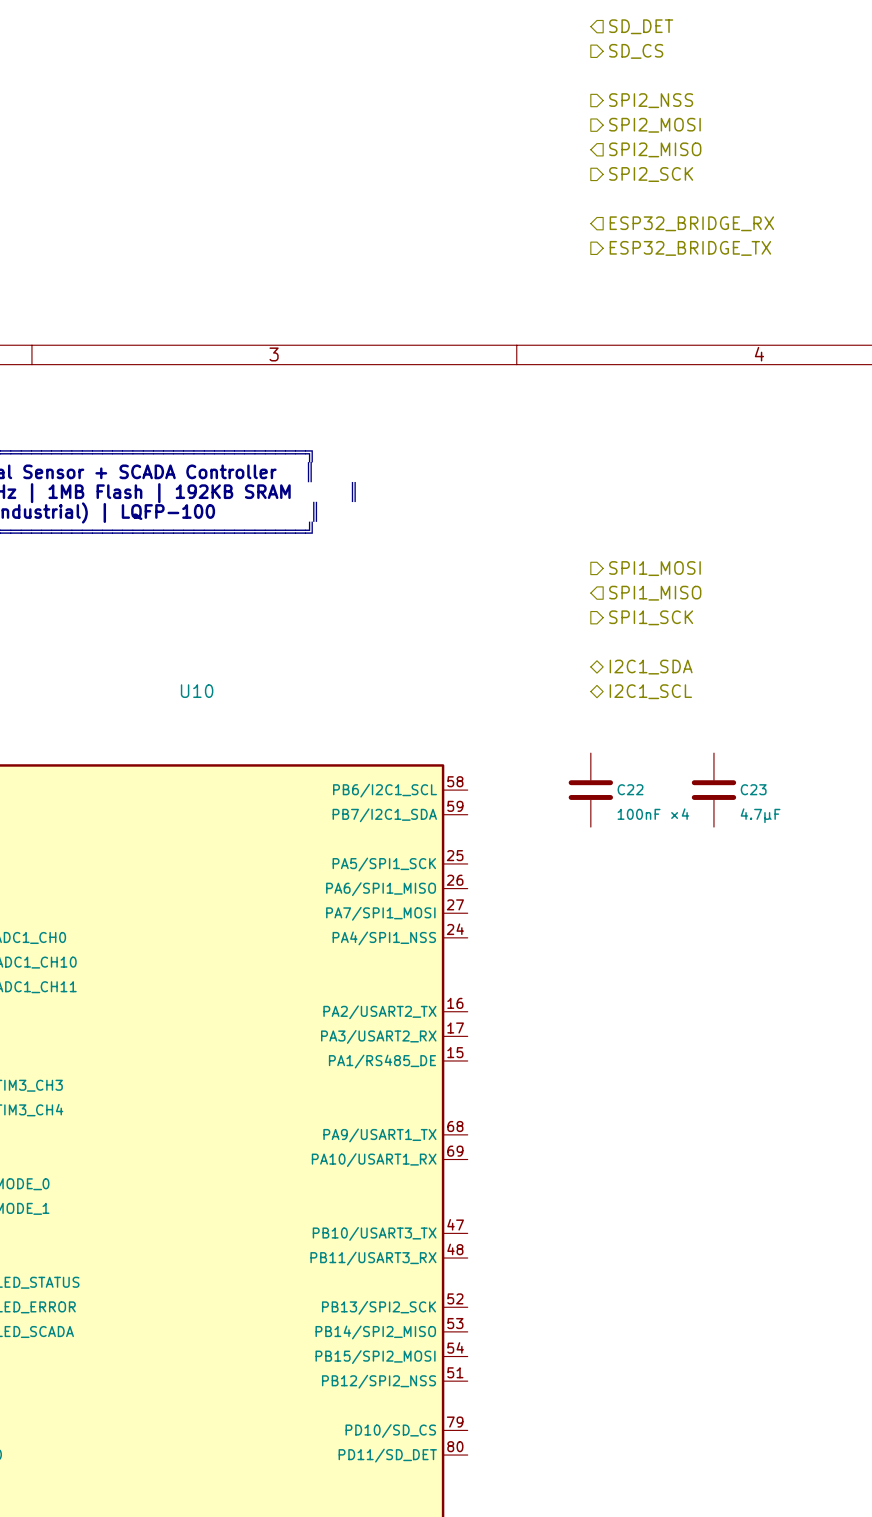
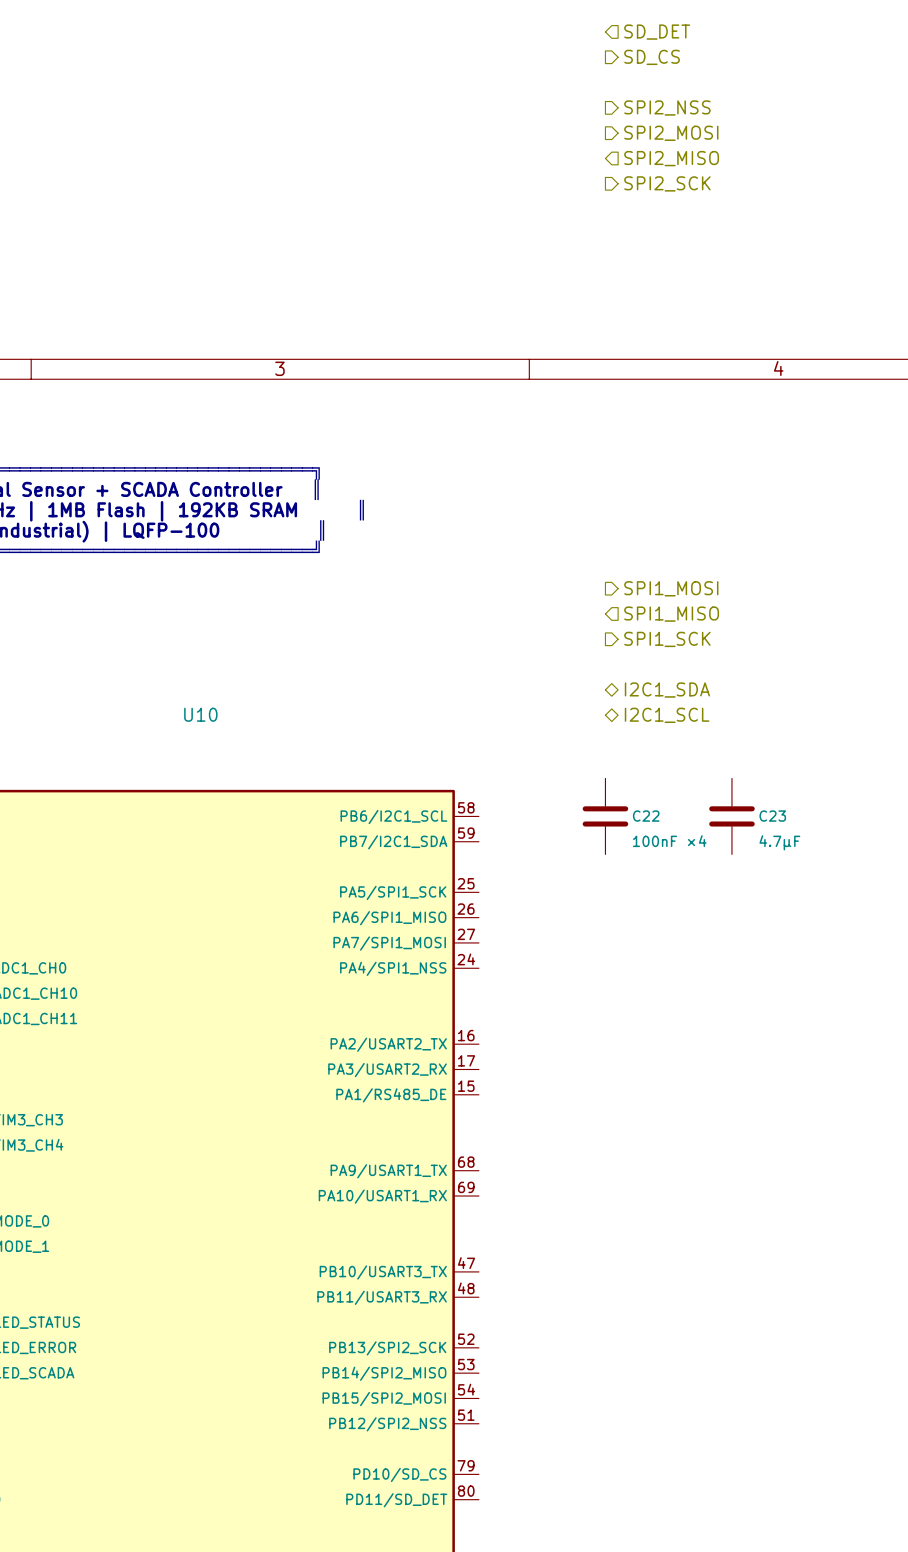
hierarchical label: ESP32_BRIDGE_RX (691, 223) -> none
hierarchical label: ESP32_BRIDGE_TX (690, 248) -> none

